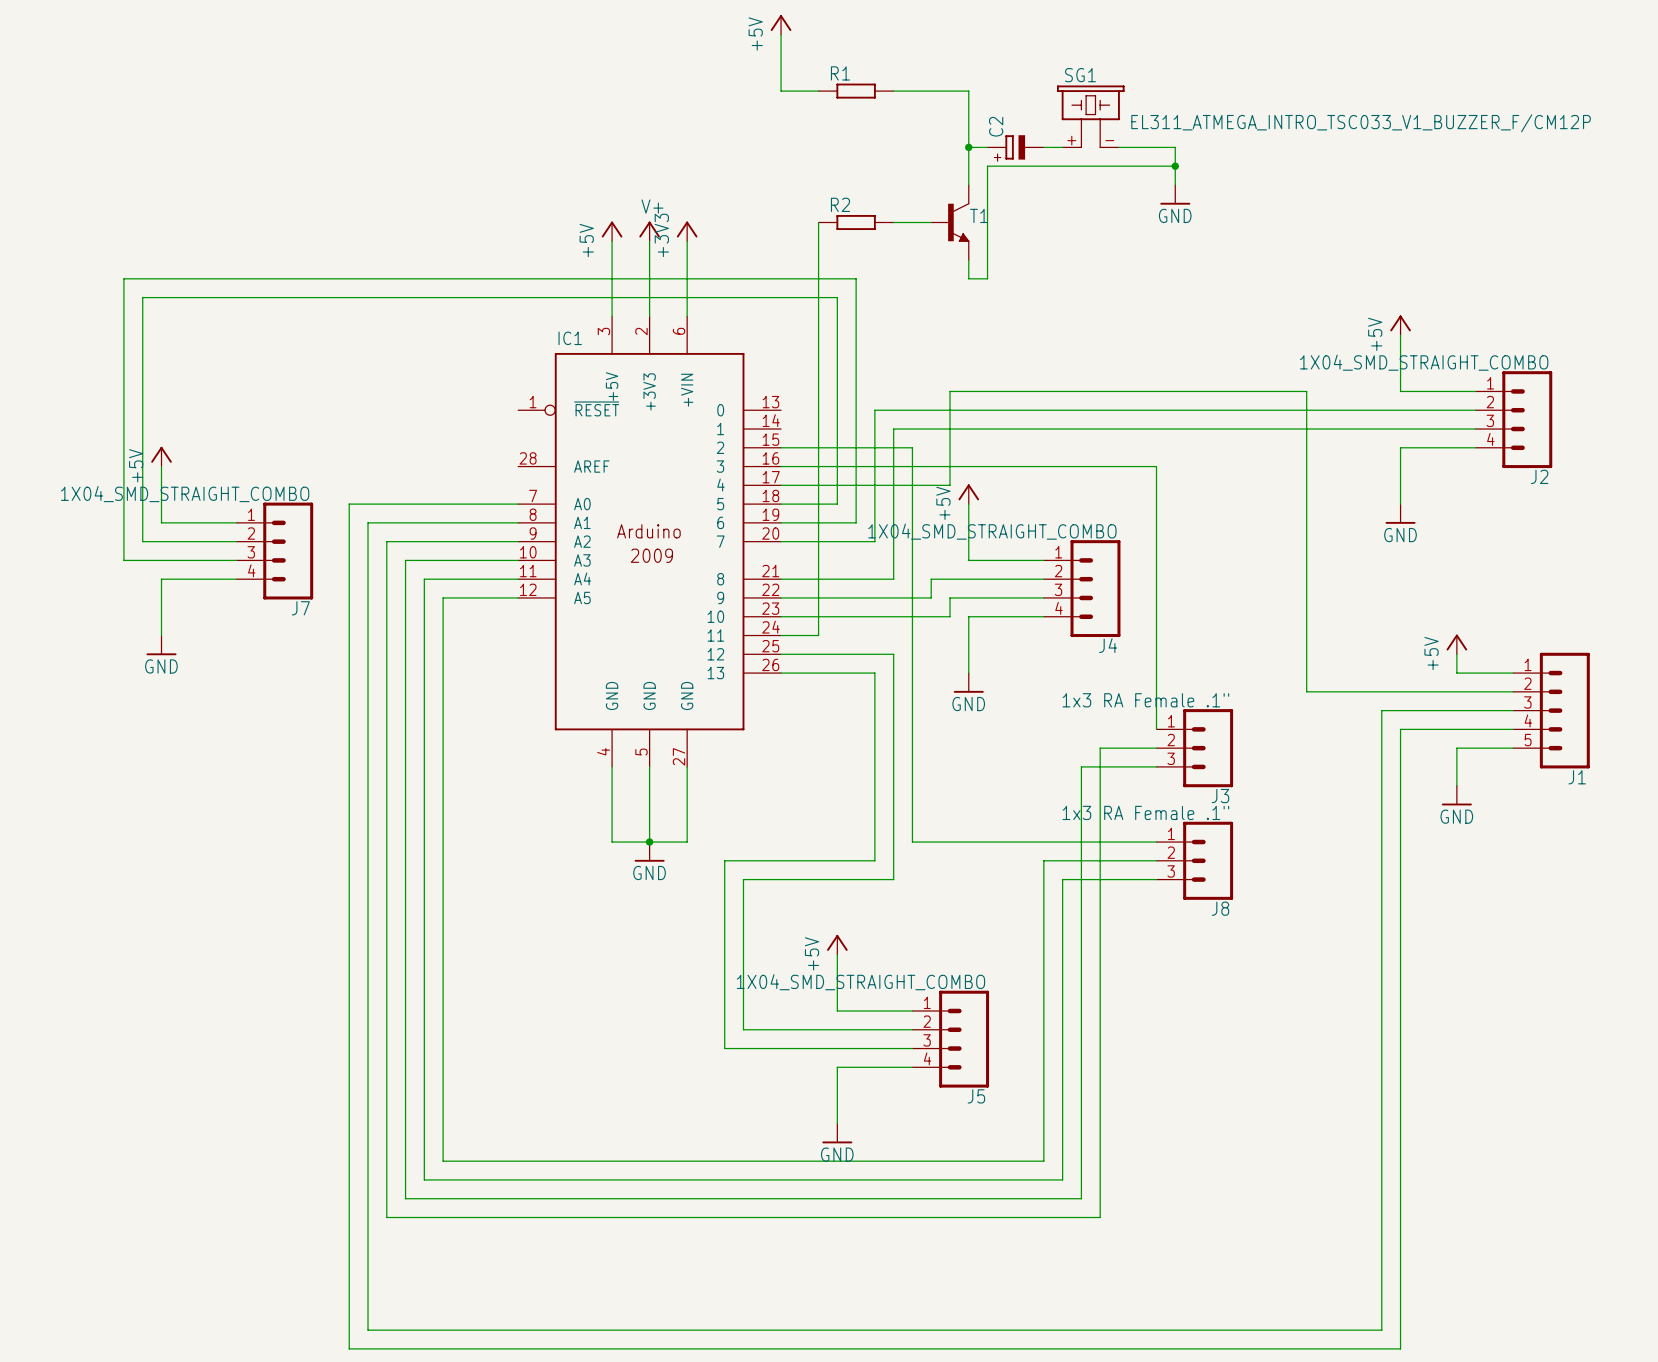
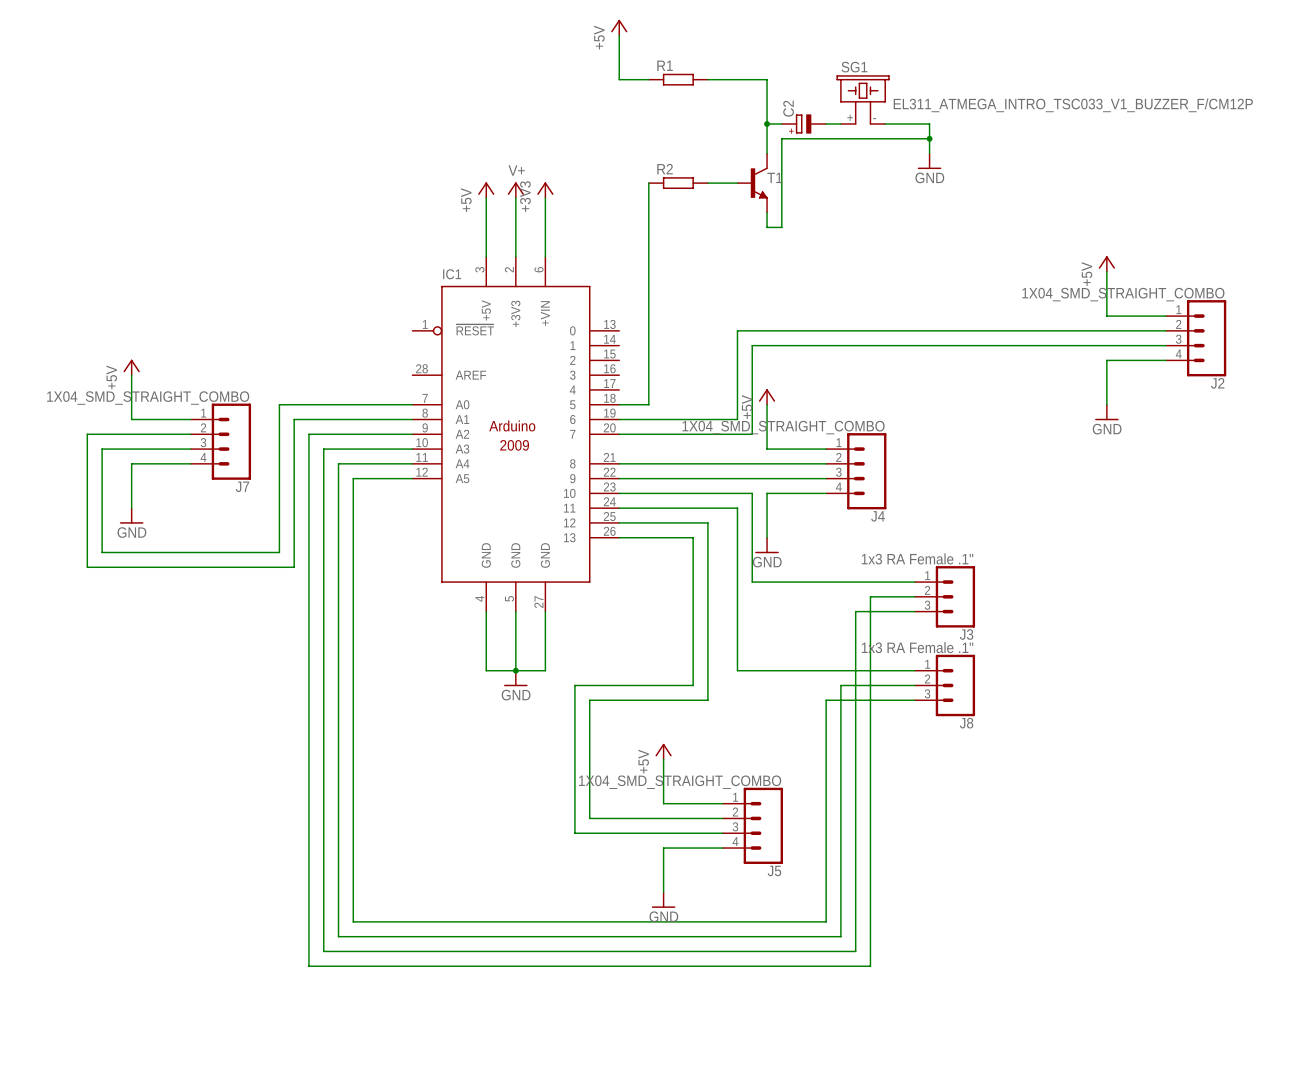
wire: (931, 410) (874, 410) (874, 541) -> (737, 330) (737, 419) (678, 419)
wire: (781, 447) (912, 447) (912, 842) (931, 842) -> (648, 508) (737, 508) (737, 670)
wire: (781, 466) (1156, 466) (1156, 729) -> (752, 493) (752, 582) (914, 582)
wire: (781, 485) (949, 485) -> (693, 434) (752, 434) (752, 389)
wire: (856, 522) (856, 278) (123, 278) (123, 560) -> (279, 552) (102, 552) (102, 449)
wire: (142, 541) (142, 297) (837, 297) (837, 504) (818, 504) (818, 635) -> (116, 434) (87, 434) (87, 567) (294, 567)
wire: (893, 579) (893, 429) (949, 429) (949, 391) (1306, 391) (1306, 691) (1513, 691) -> (707, 463) (737, 463)
wire: (931, 579) (931, 597) -> (752, 478) (737, 478)
wire: (949, 597) (949, 616) -> none
power symbol: +5V (1456, 644) -> none
wire: (1456, 654) (1456, 673) (1513, 673) -> none
wire: (349, 691) (349, 1348) (1400, 1348) (1400, 729) (1513, 729) -> none
wire: (368, 710) (368, 1330) (1381, 1330) (1381, 710) (1513, 710) -> none
J1: (1551, 710) -> none
wire: (1513, 748) (1456, 748) (1456, 785) -> none
power symbol: GND (1456, 795) -> none
wire: (1062, 860) (1043, 860) (1043, 879) -> (840, 685) (840, 700) (826, 700)

